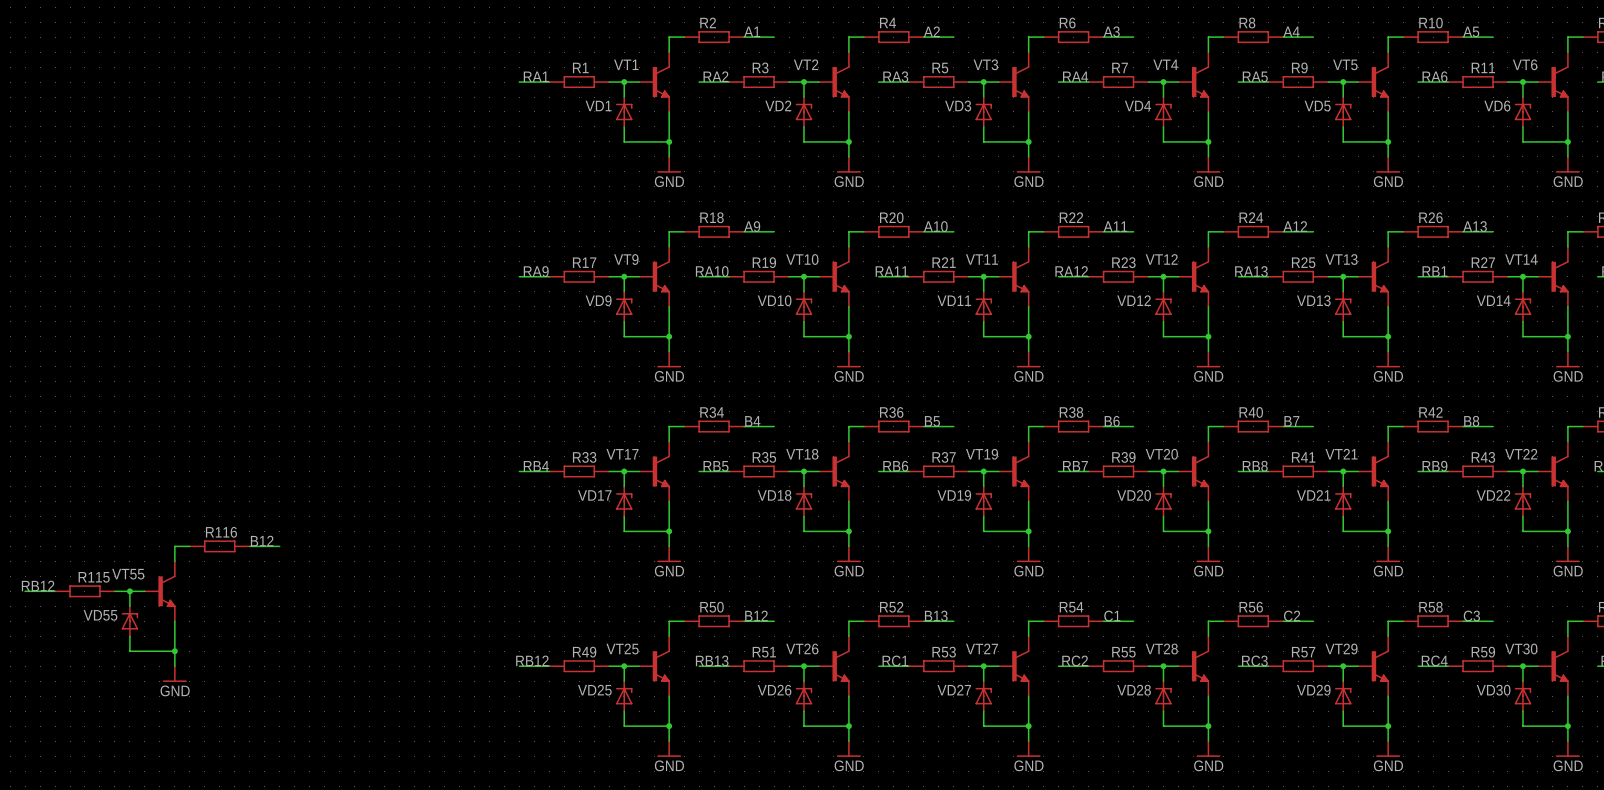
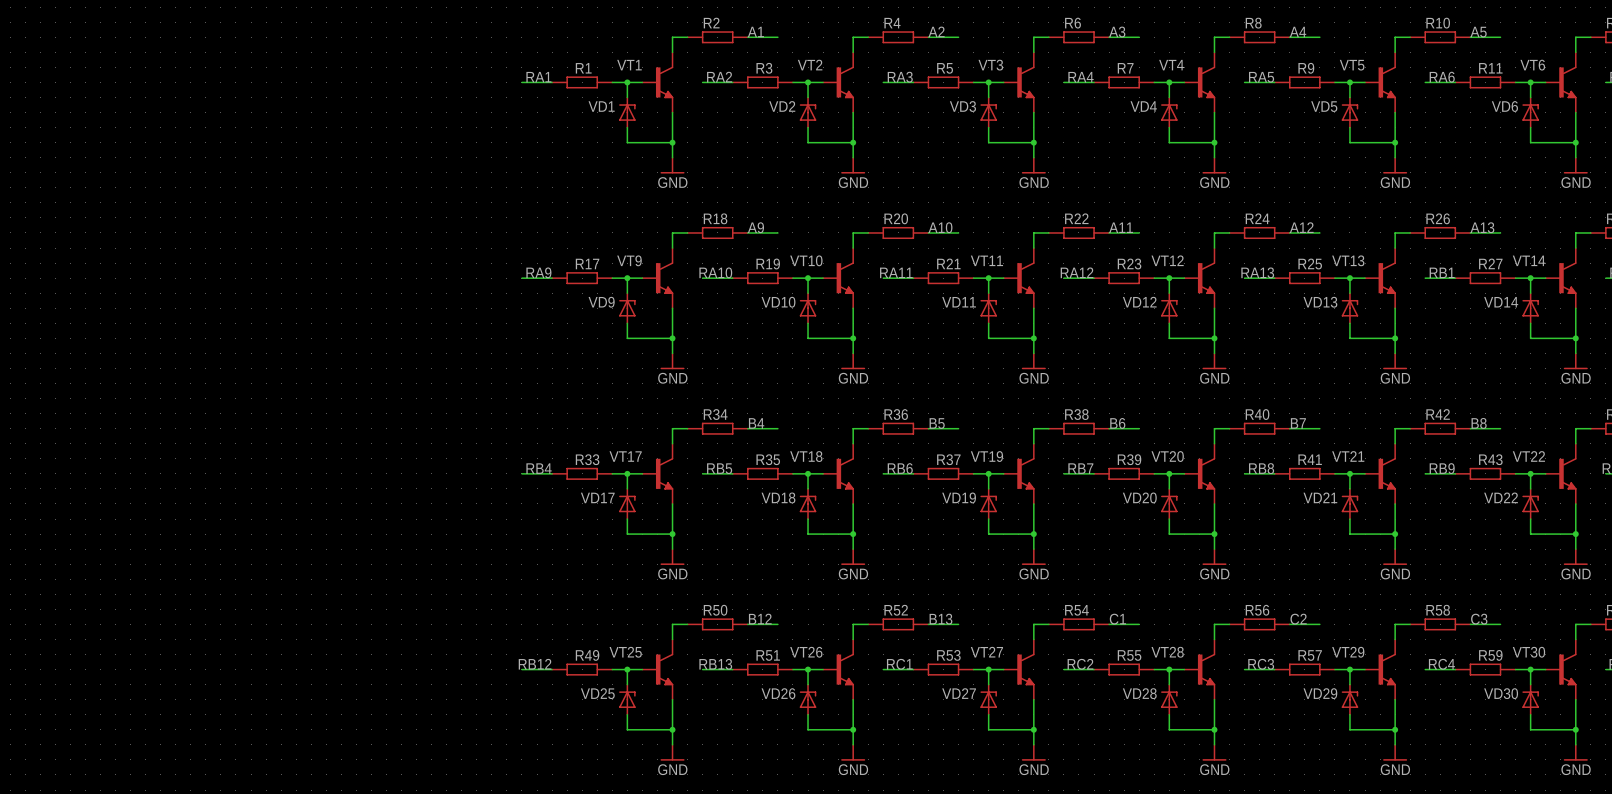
label: B12 (262, 541) -> none
wire: (189, 546) (174, 546) (174, 561) -> none
R116: (219, 546) -> none
wire: (249, 546) (279, 546) -> none
label: RB12 (38, 586) -> none
wire: (25, 591) (55, 591) -> none
R115: (84, 591) -> none
wire: (114, 591) (144, 591) -> none
wire: (129, 591) (129, 606) -> none
junction: (129, 591) -> none
VT55: (160, 591) -> none
VD55: (129, 621) -> none
wire: (174, 621) (174, 666) -> none
wire: (129, 636) (129, 651) (174, 651) -> none
junction: (174, 651) -> none
power symbol: GND (174, 674) -> none

